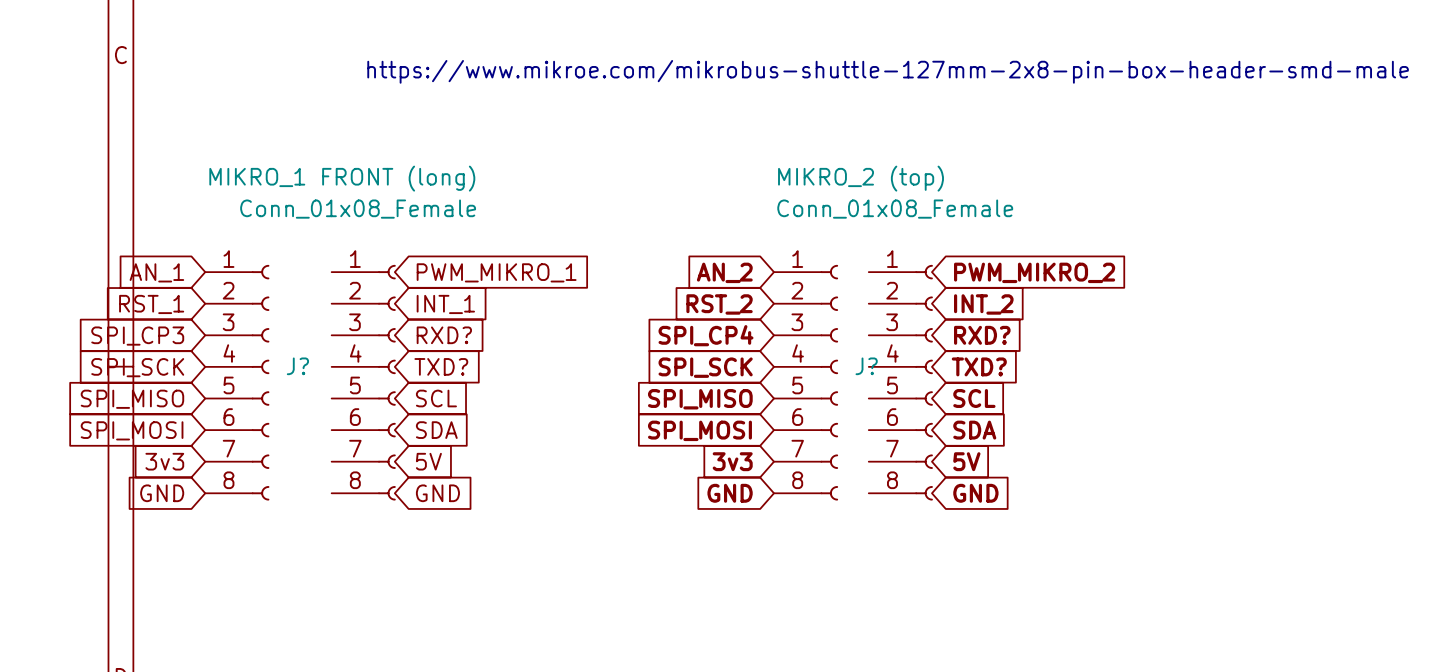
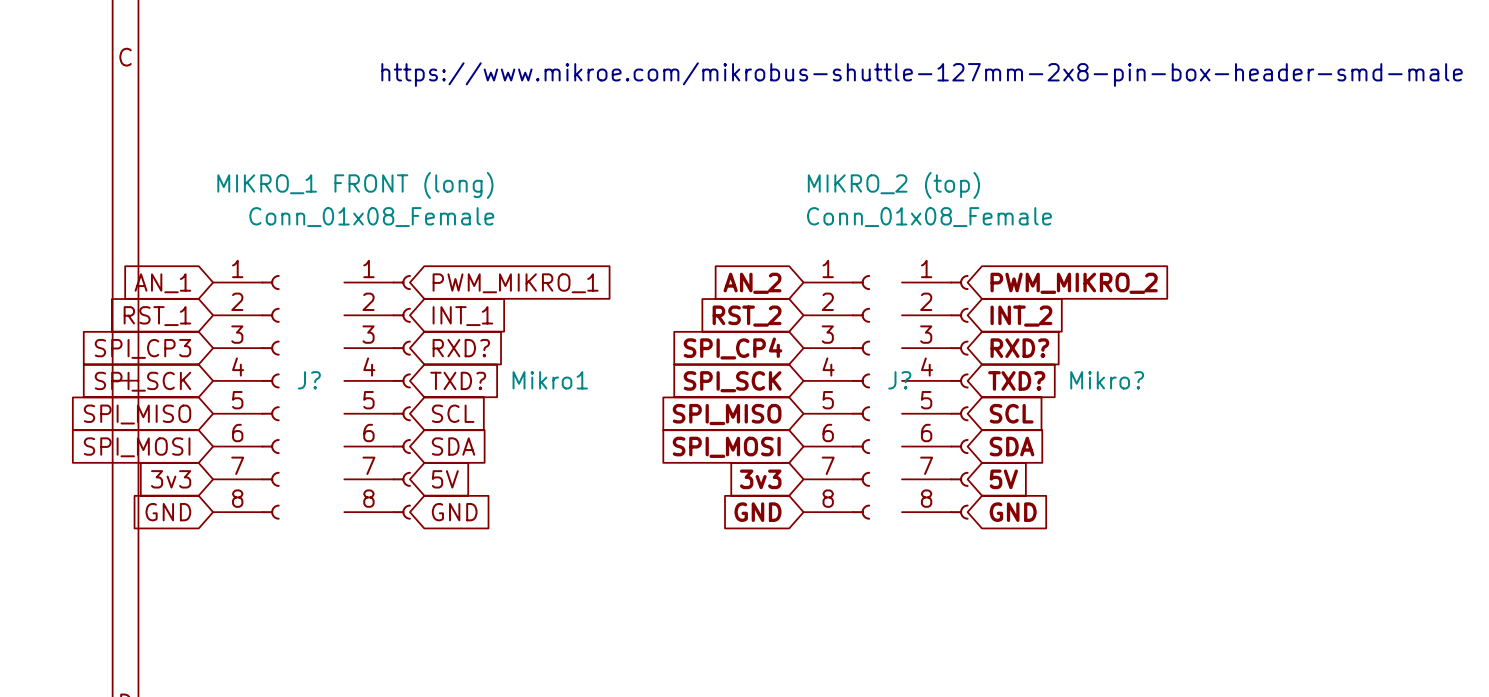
Mikro1 name: none -> Mikro1 (550, 380)
Mikro? name: none -> Mikro? (1107, 380)

